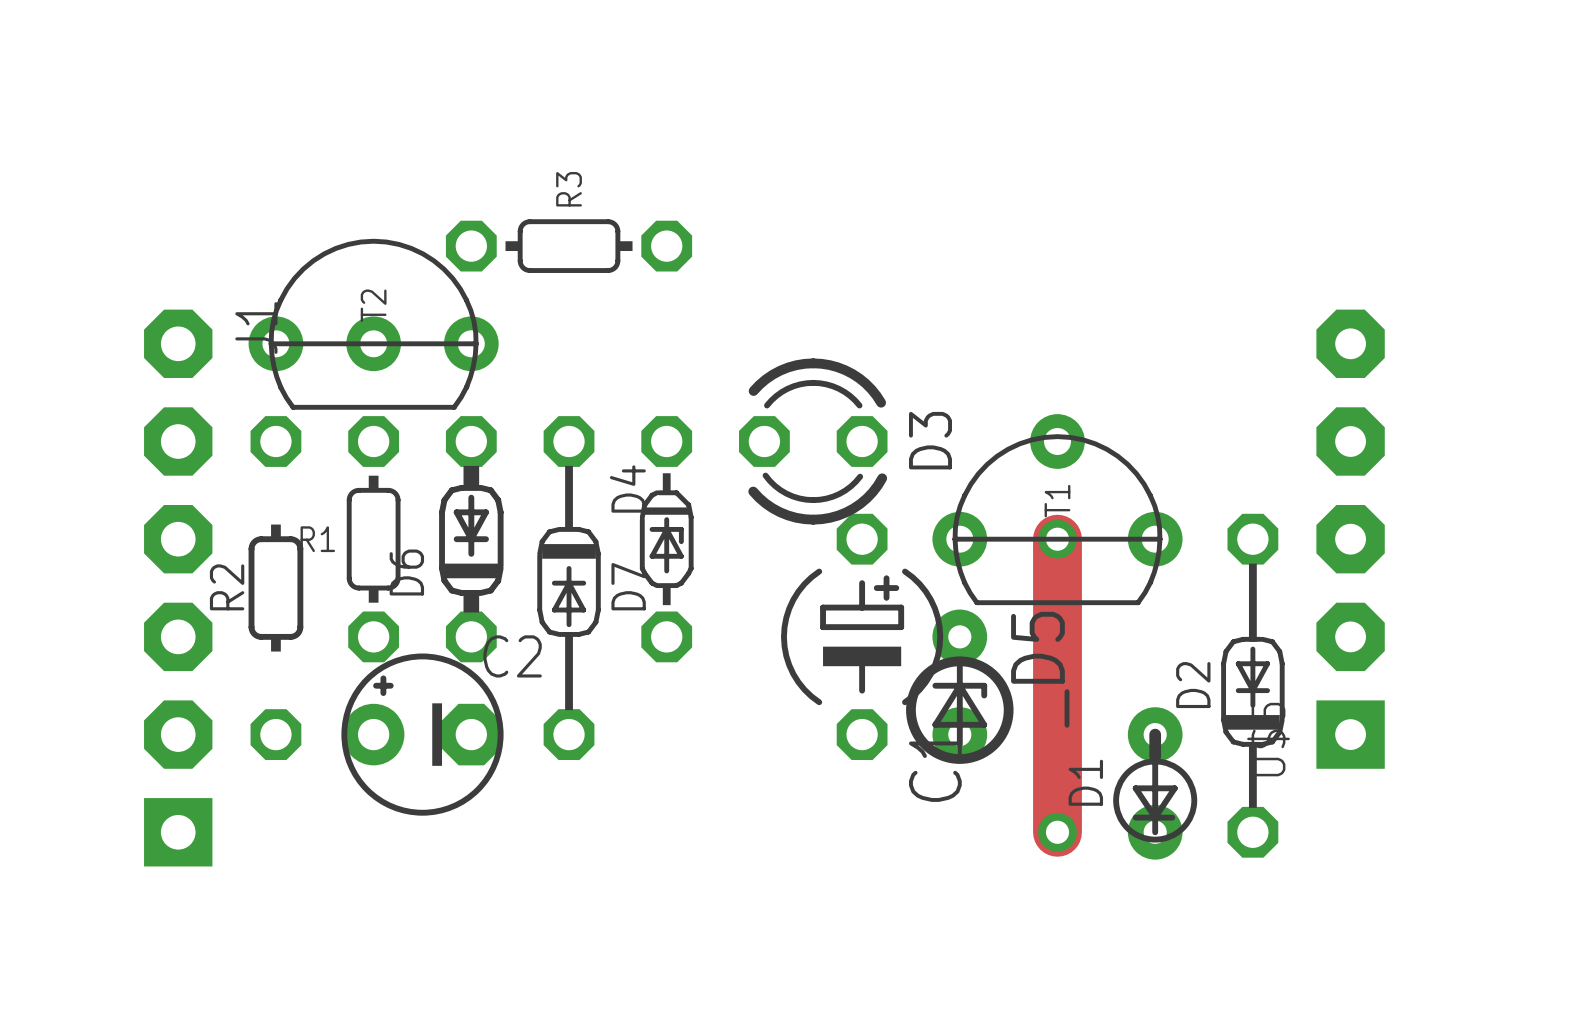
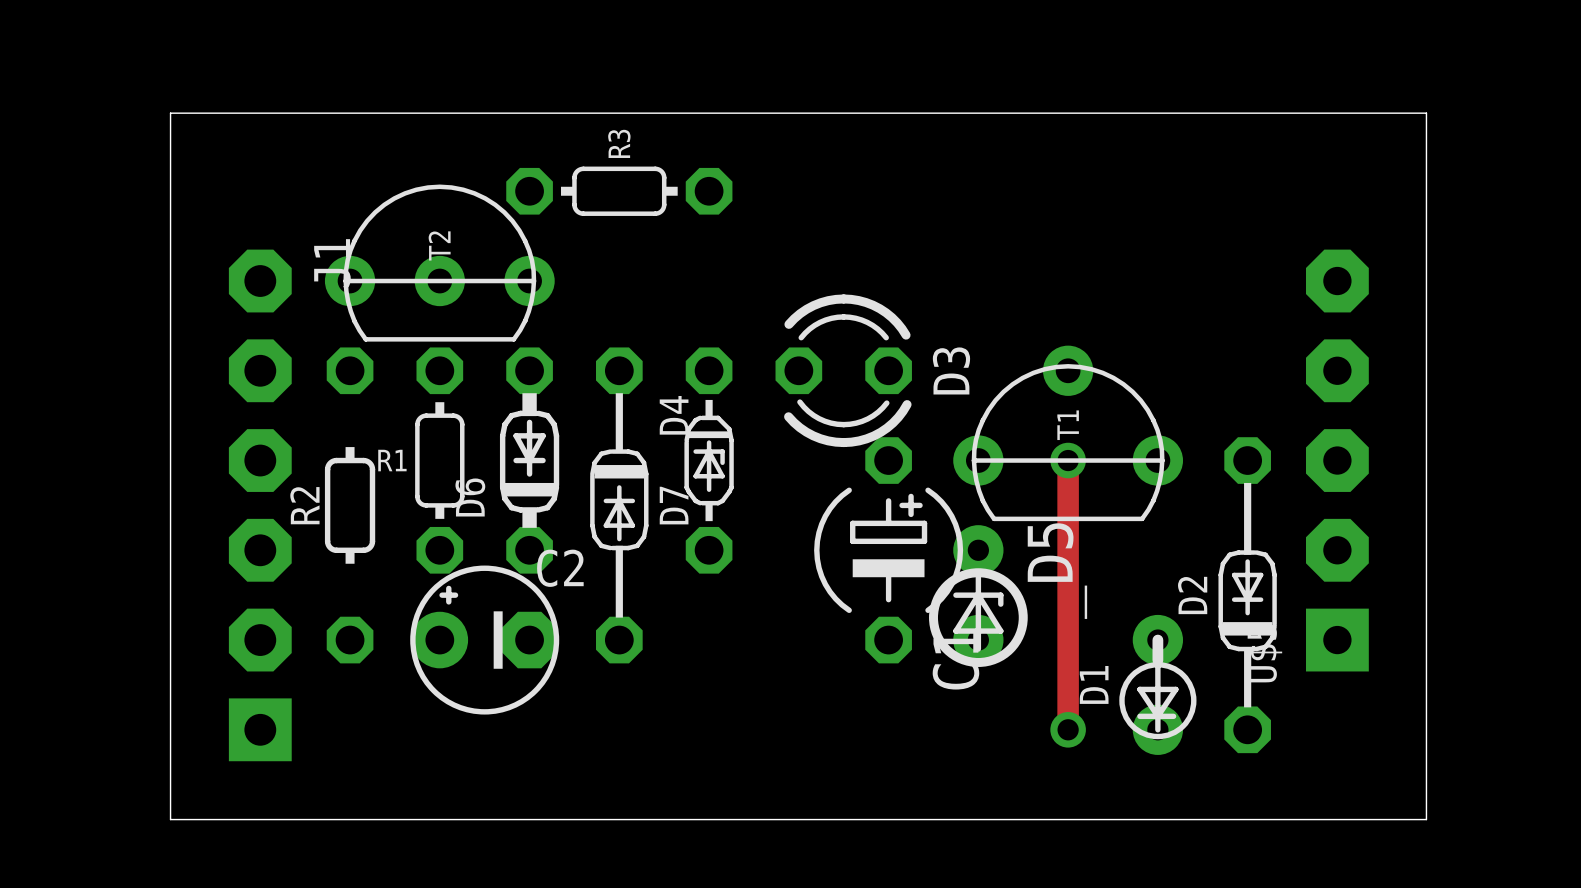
board edge: none -> (170, 113) (1426, 113) (1426, 819) (170, 819) (170, 113)
track width: thick (1057, 539) (1057, 832) -> thin (1068, 460) (1068, 729)

